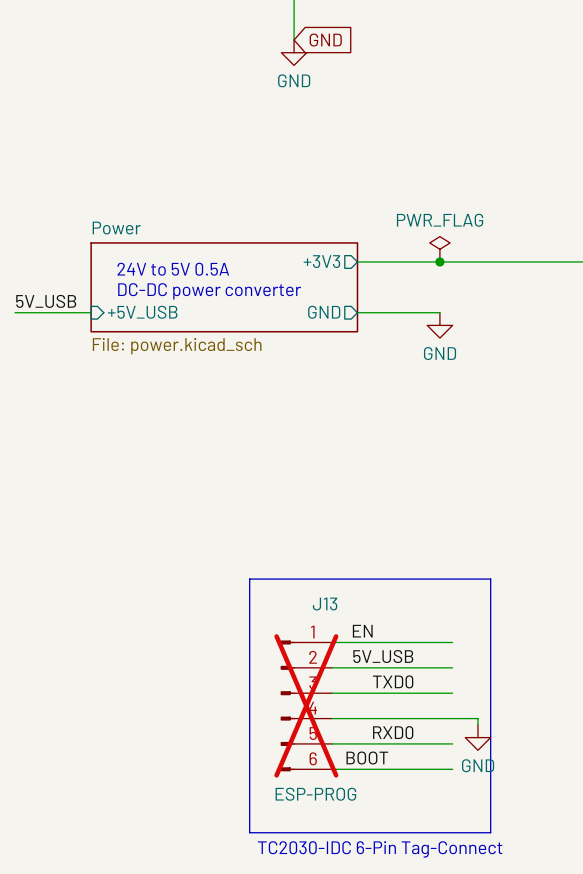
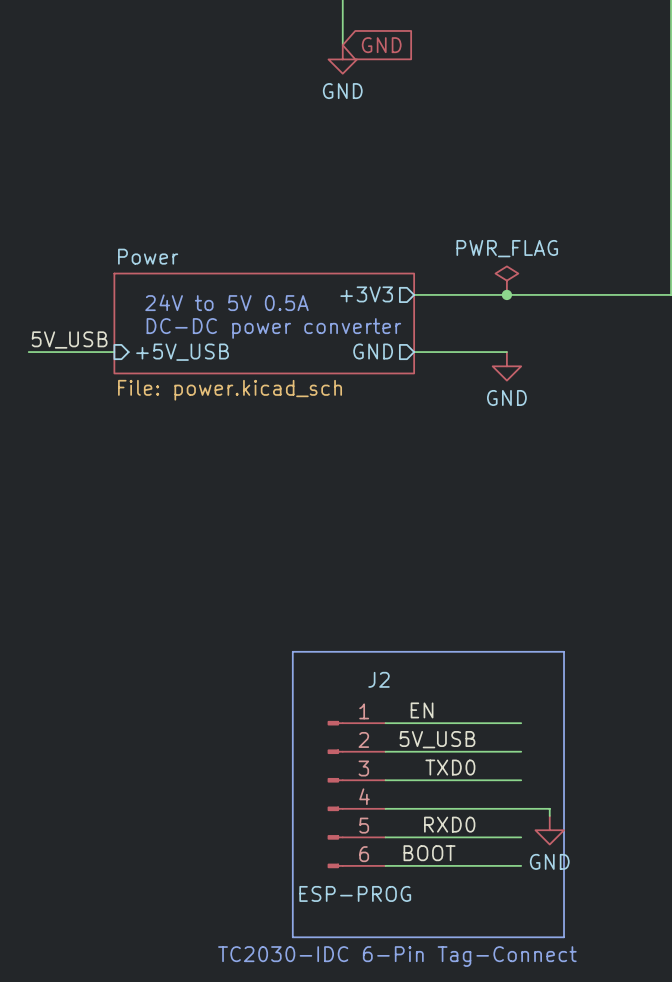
J13 name: J13 (325, 604) -> J2 (379, 679)
J13 do-not-place cross: (306, 705) -> none

